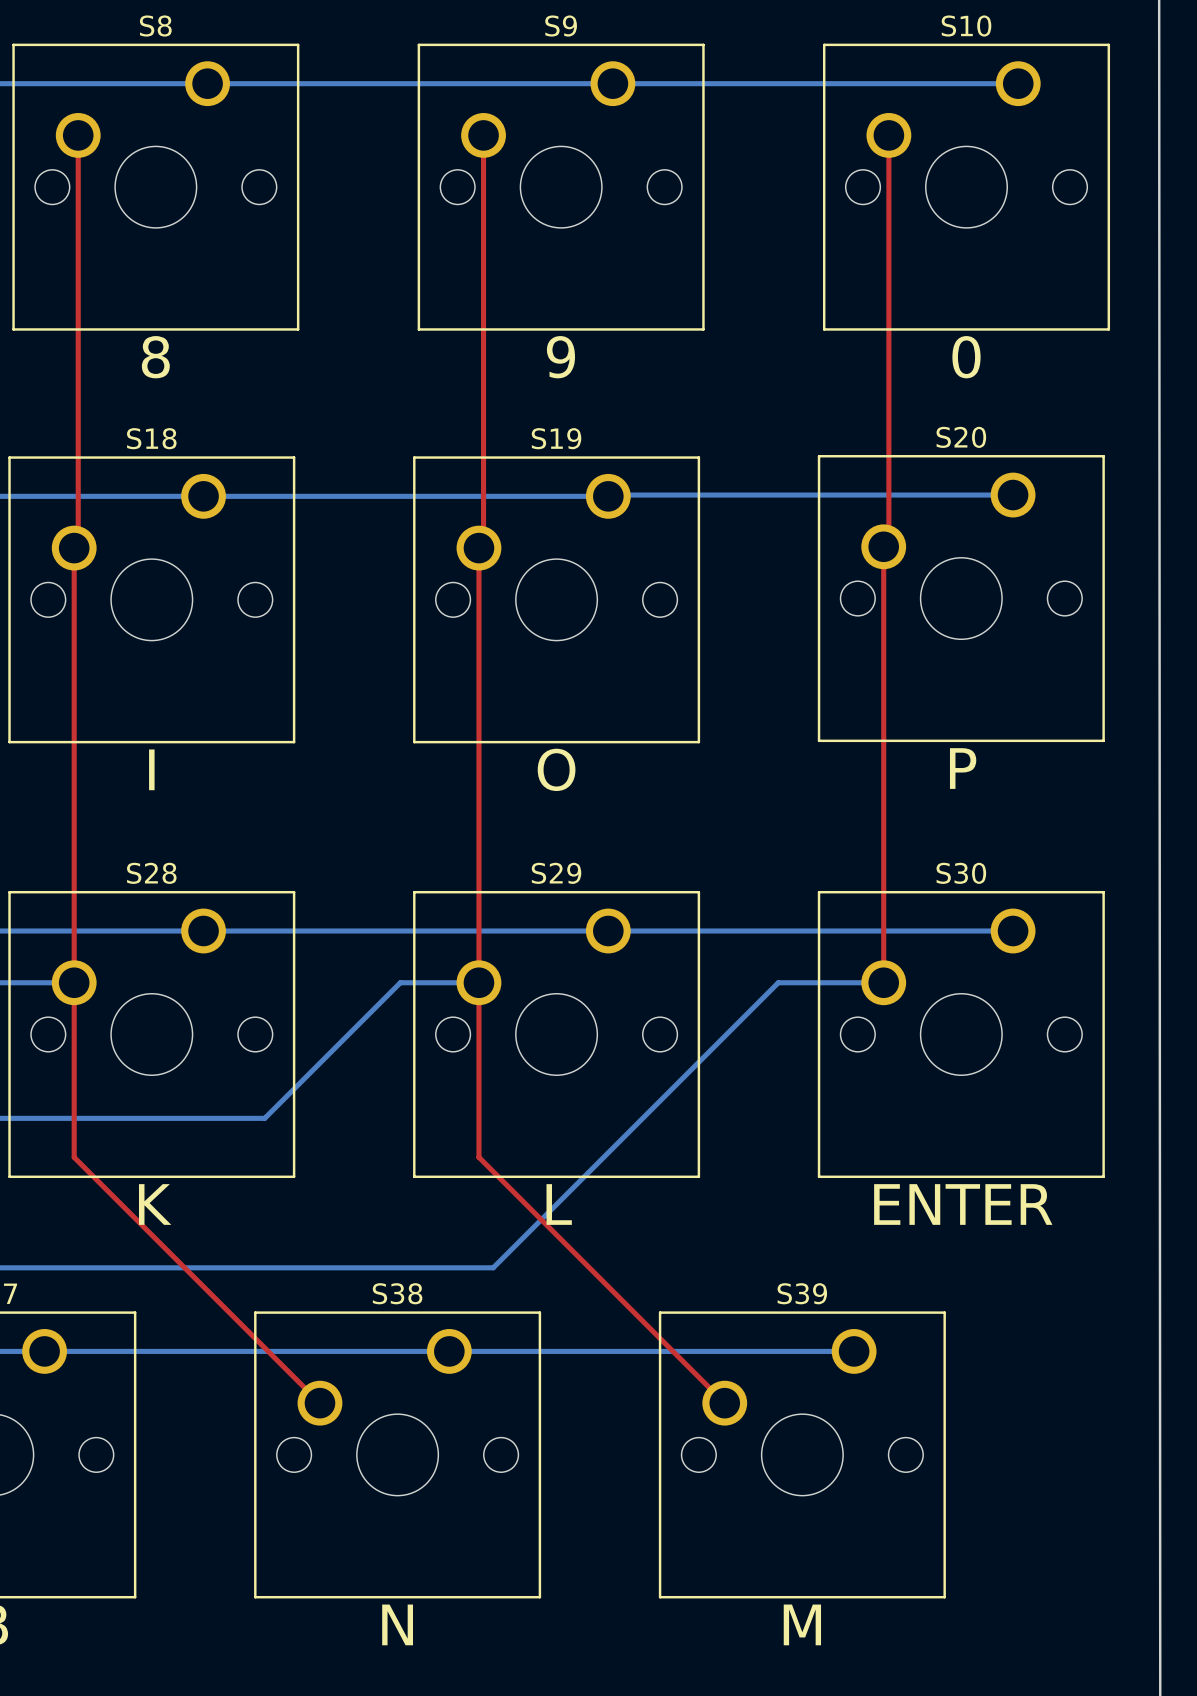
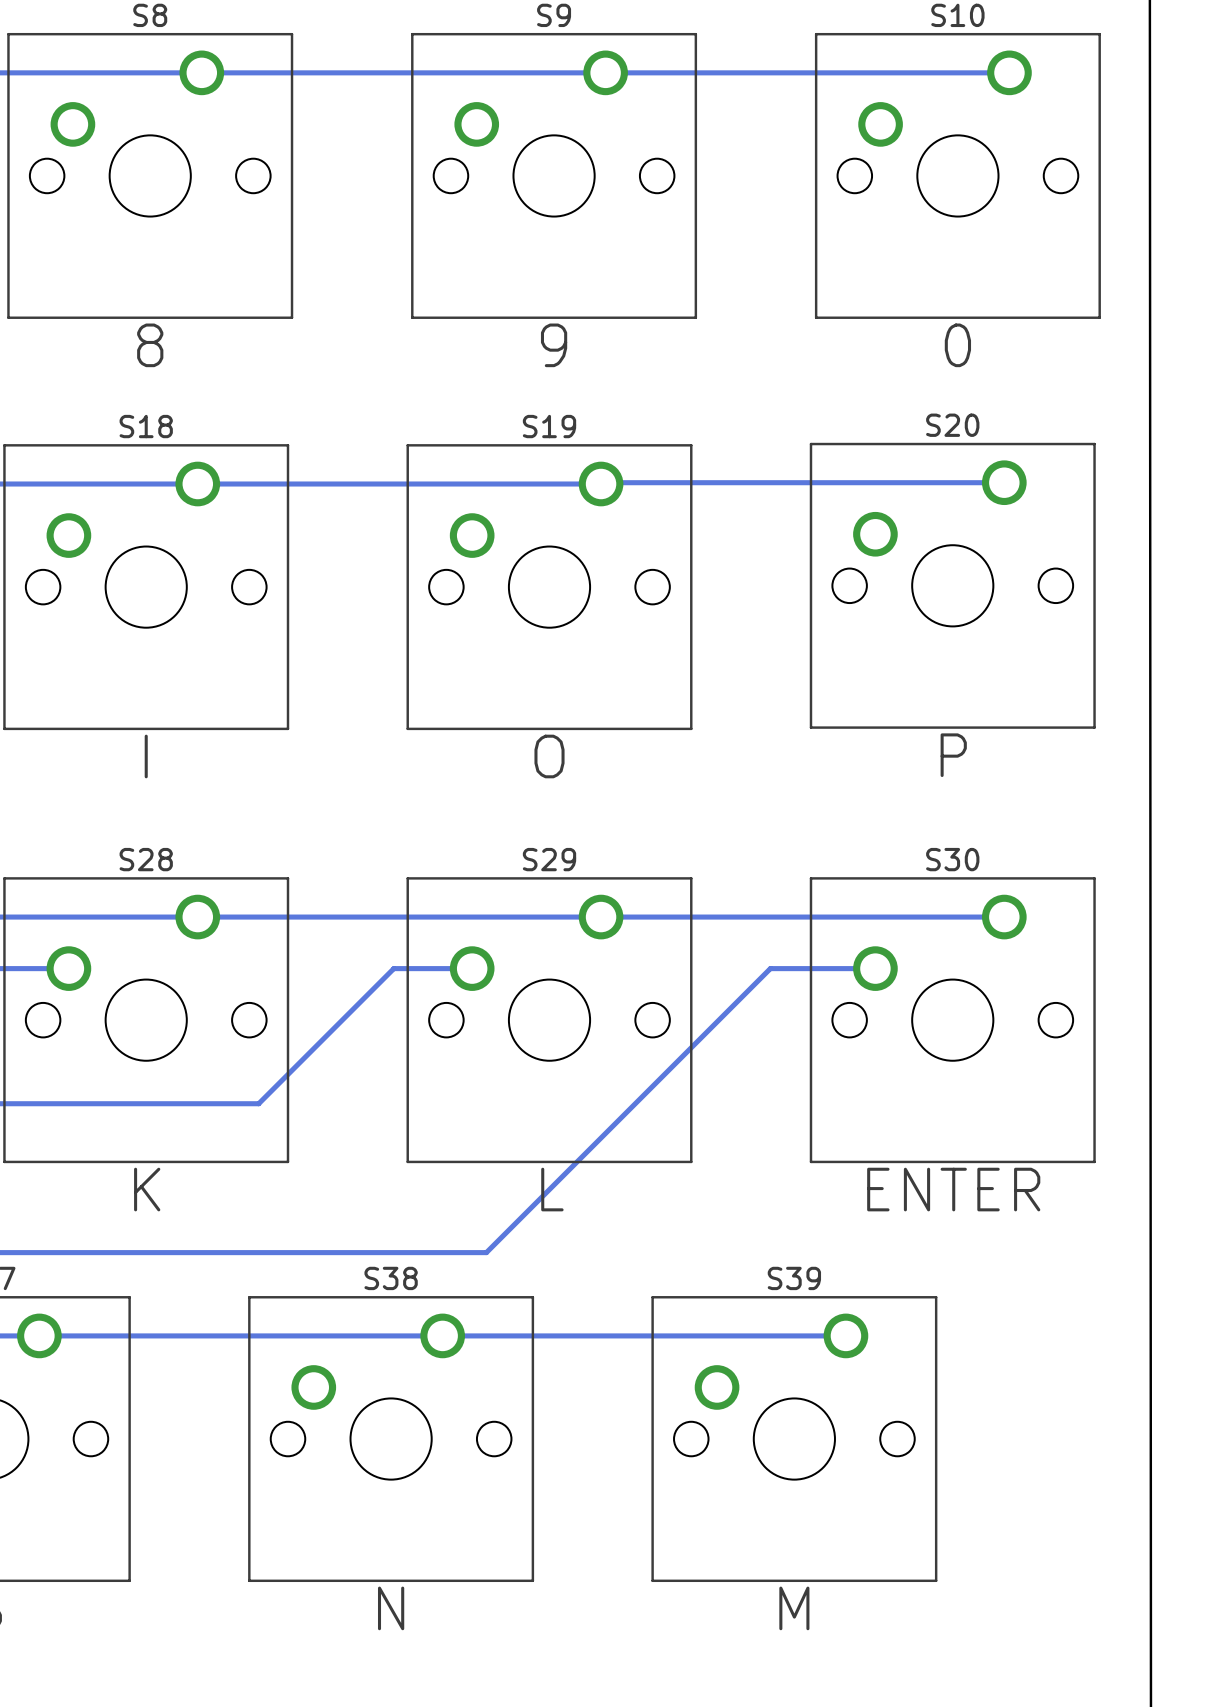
top track: (78, 135) (78, 544) (74, 548) (74, 1157) (319, 1403) -> none
top track: (483, 135) (483, 543) (478, 548) (478, 1157) (724, 1403) -> none
top track: (888, 135) (888, 541) (883, 546) (883, 982) -> none

